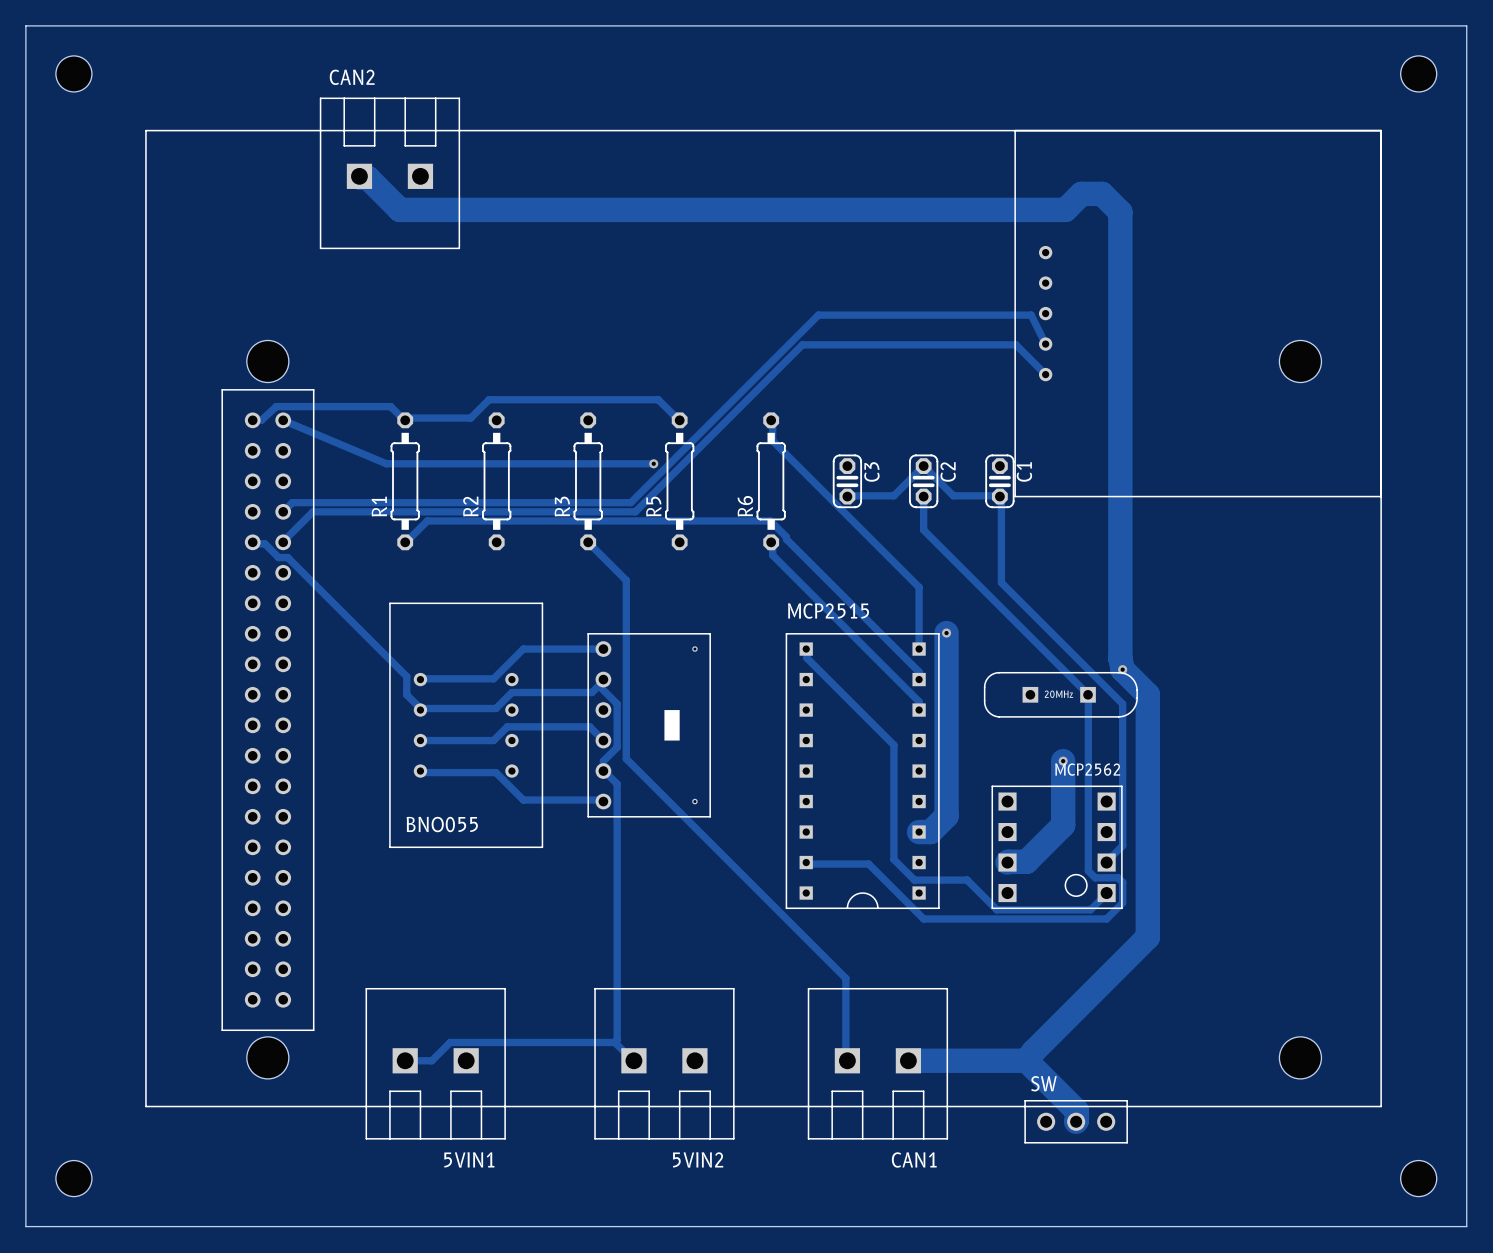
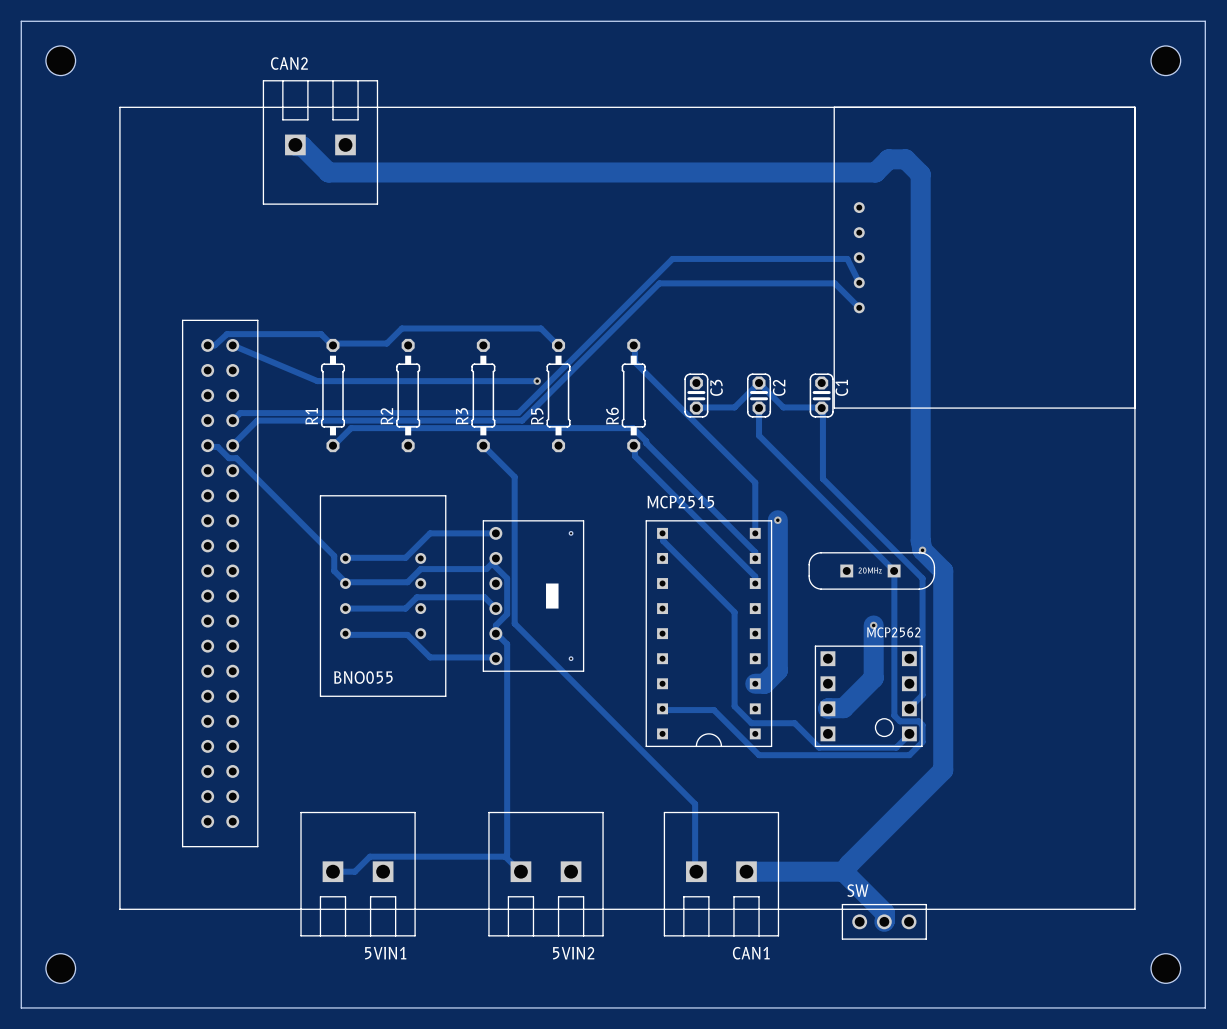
hole: (267, 361) -> none
hole: (1300, 361) -> none
hole: (267, 1057) -> none
hole: (1300, 1057) -> none

